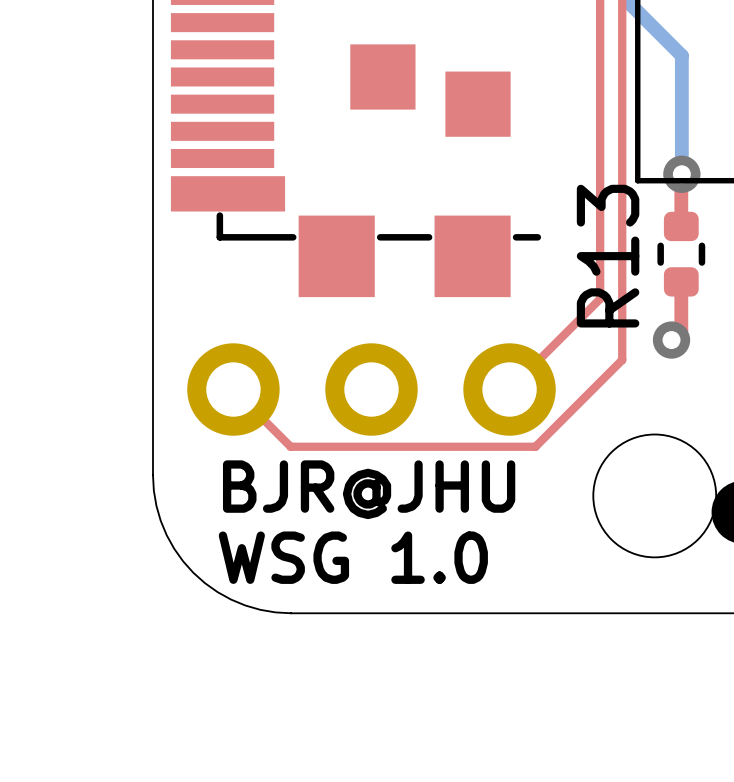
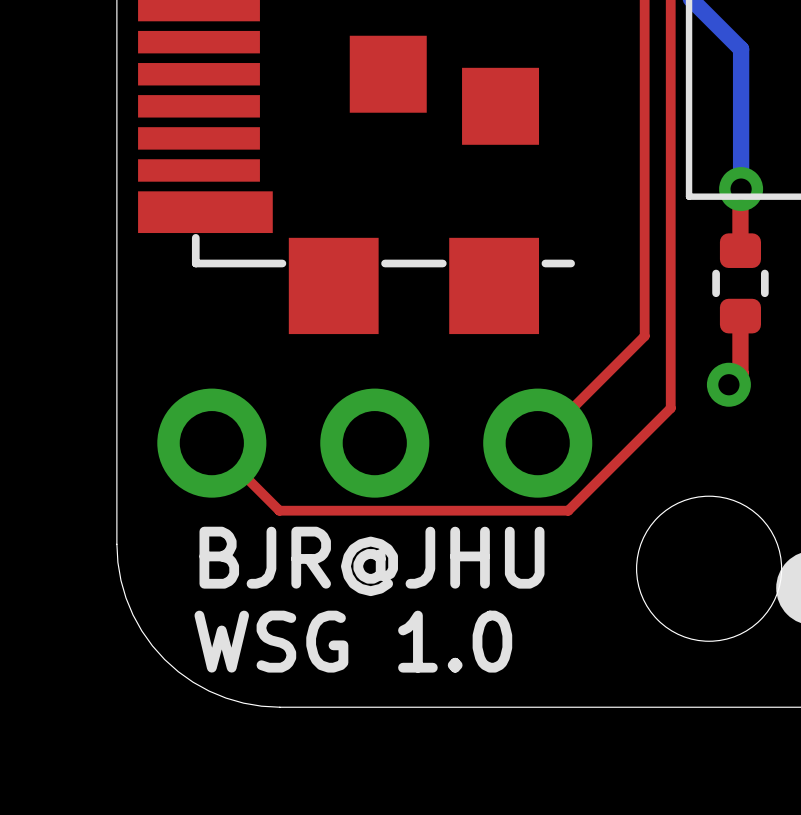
R13 name: R13 (608, 256) -> none

